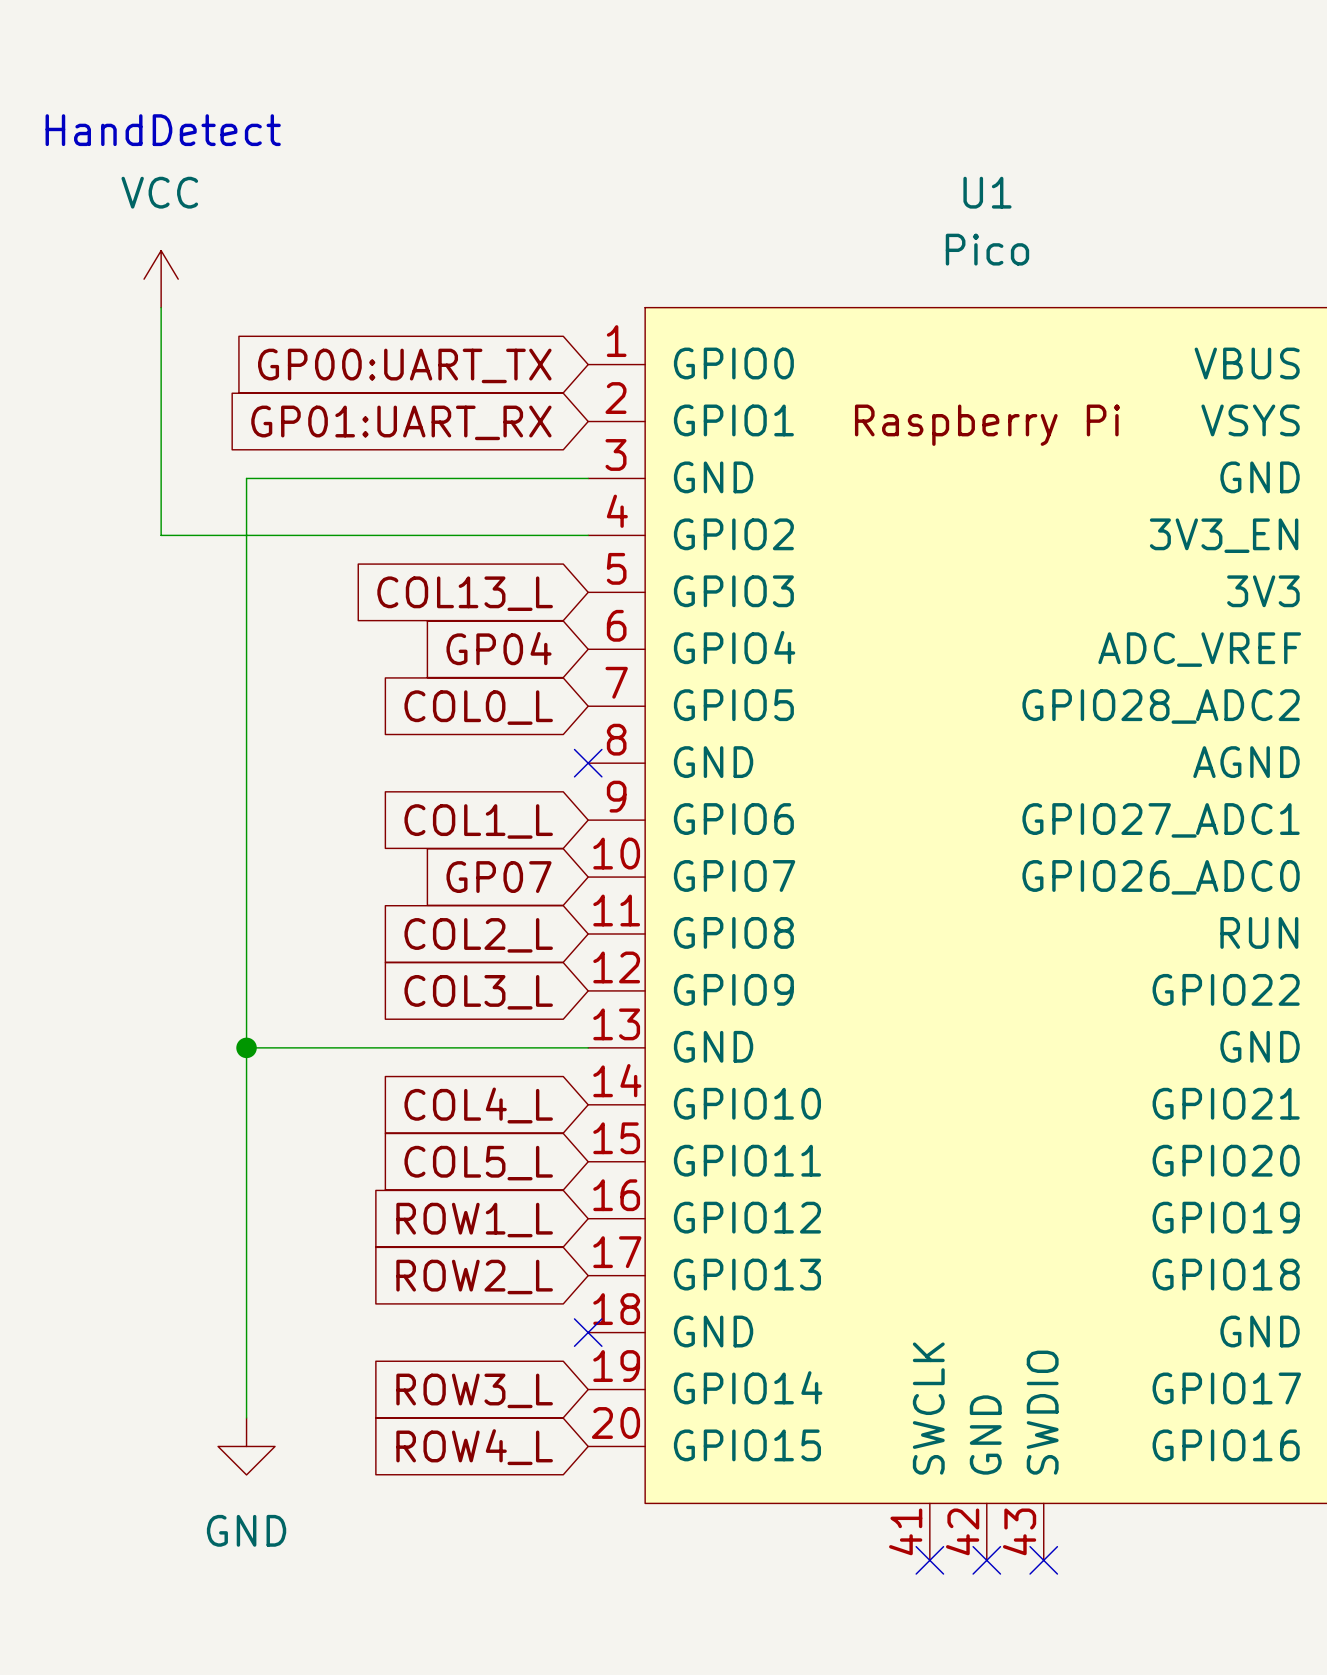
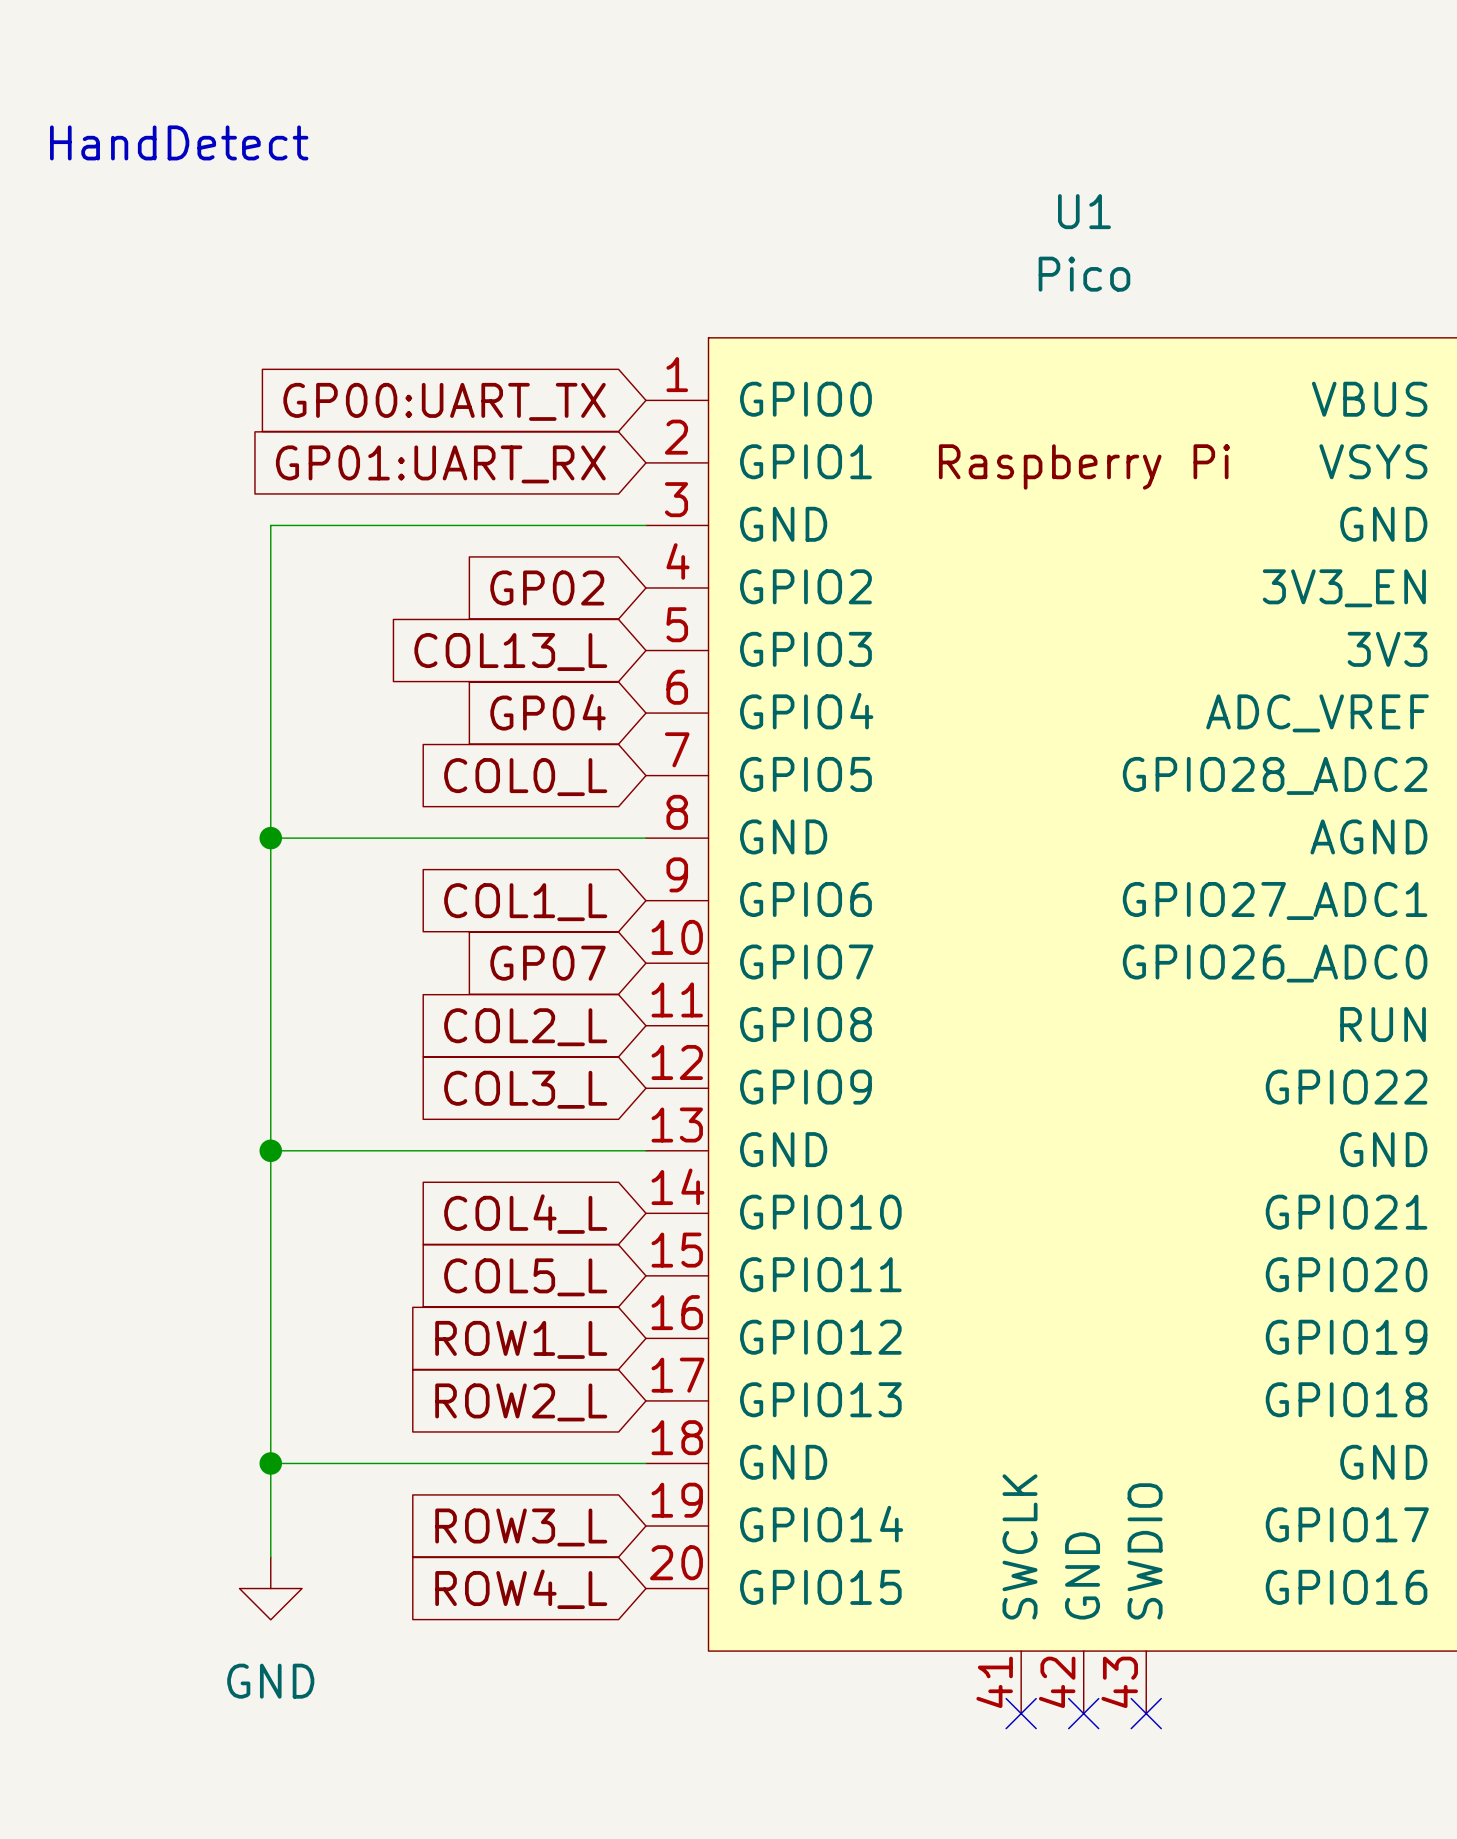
power symbol: VCC (161, 279) -> none
wire: (161, 307) (161, 535) (588, 535) -> none
global label: none -> GP02 (547, 587)
wire: none -> (270, 838) (645, 838)
junction: none -> (270, 838)
no-connect mark: (588, 763) -> none
wire: none -> (270, 1463) (645, 1463)
junction: none -> (270, 1463)
no-connect mark: (588, 1332) -> none

